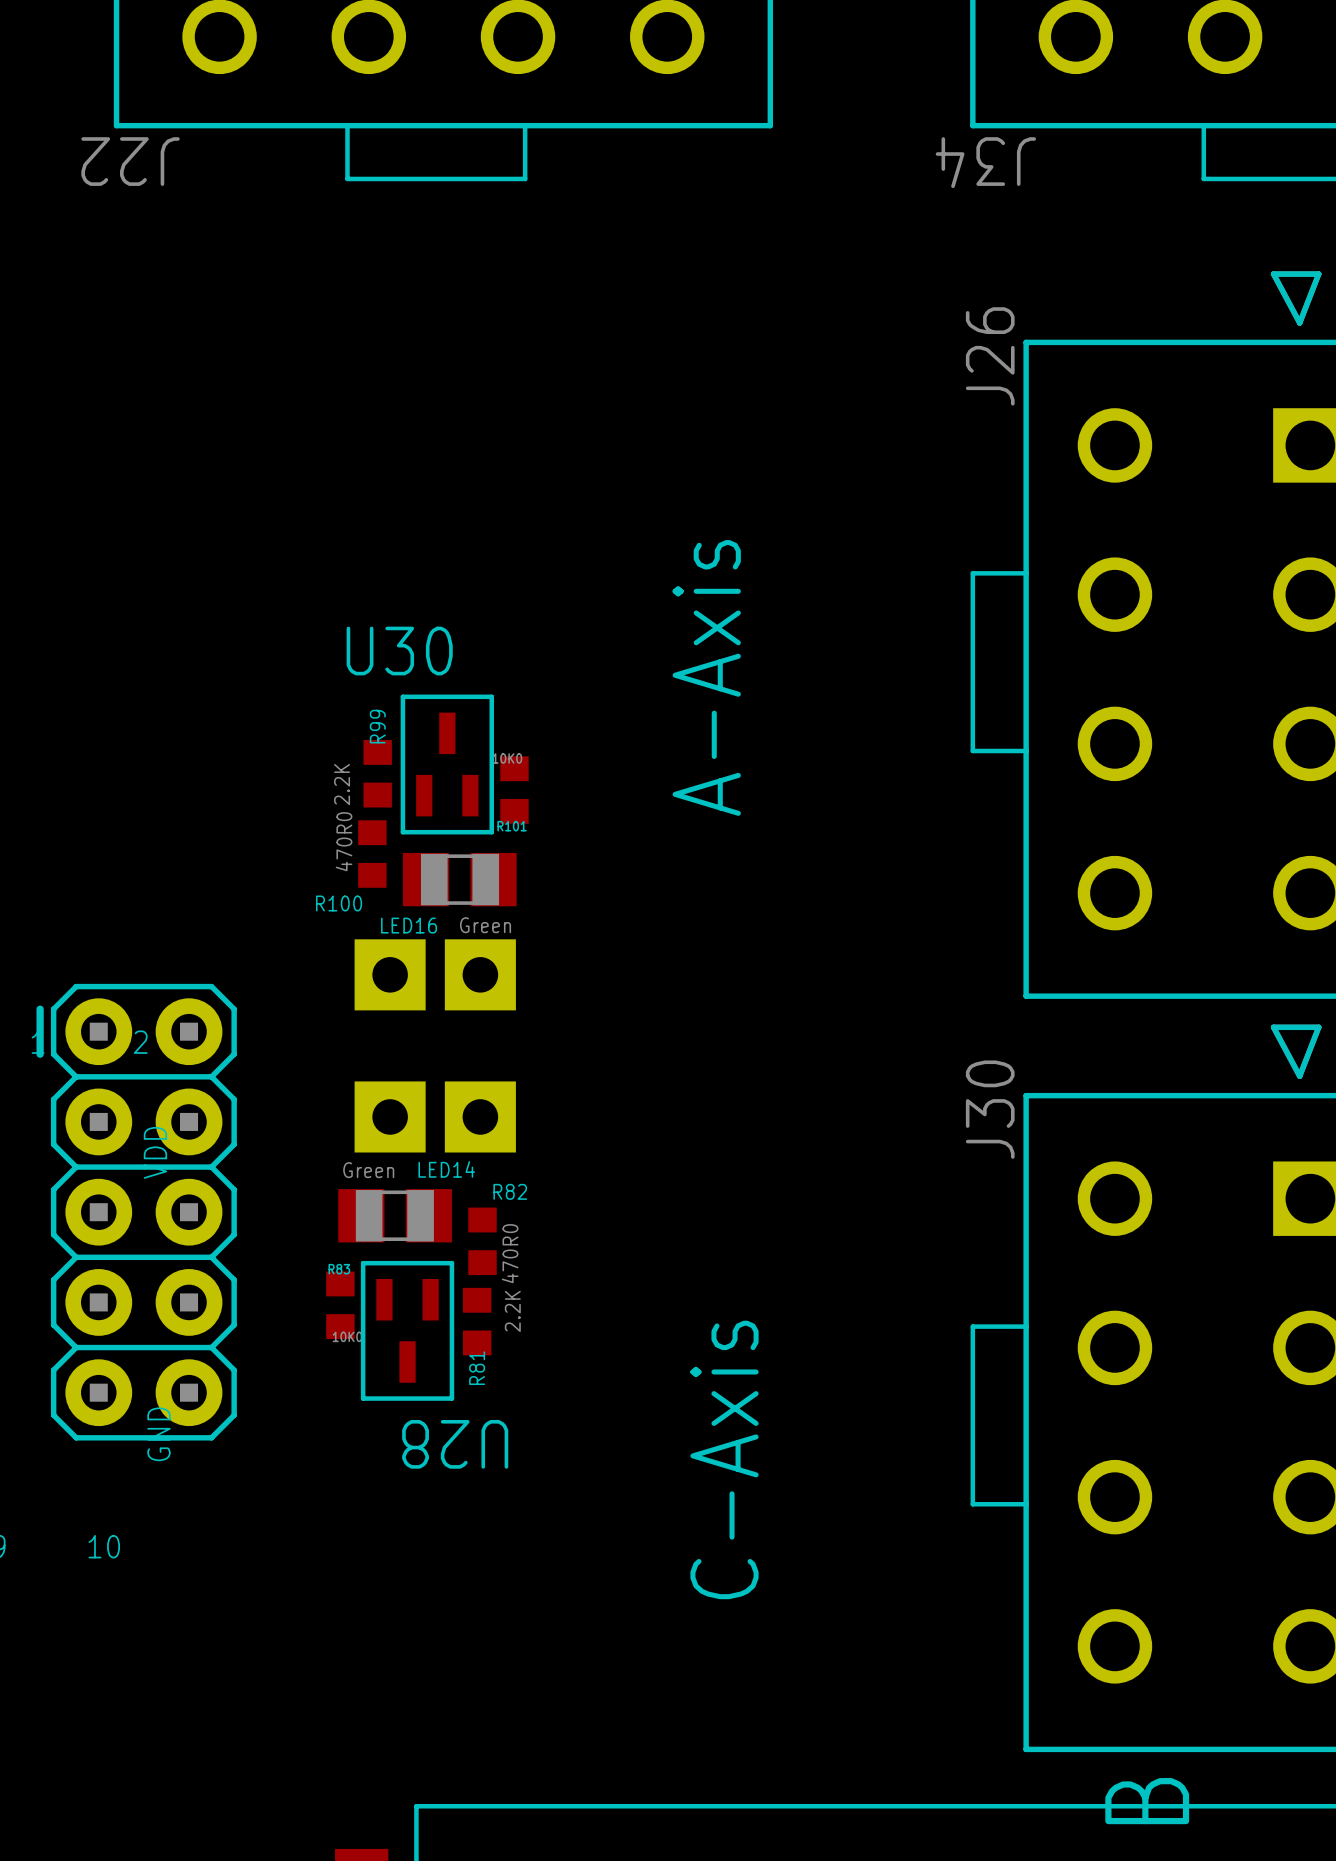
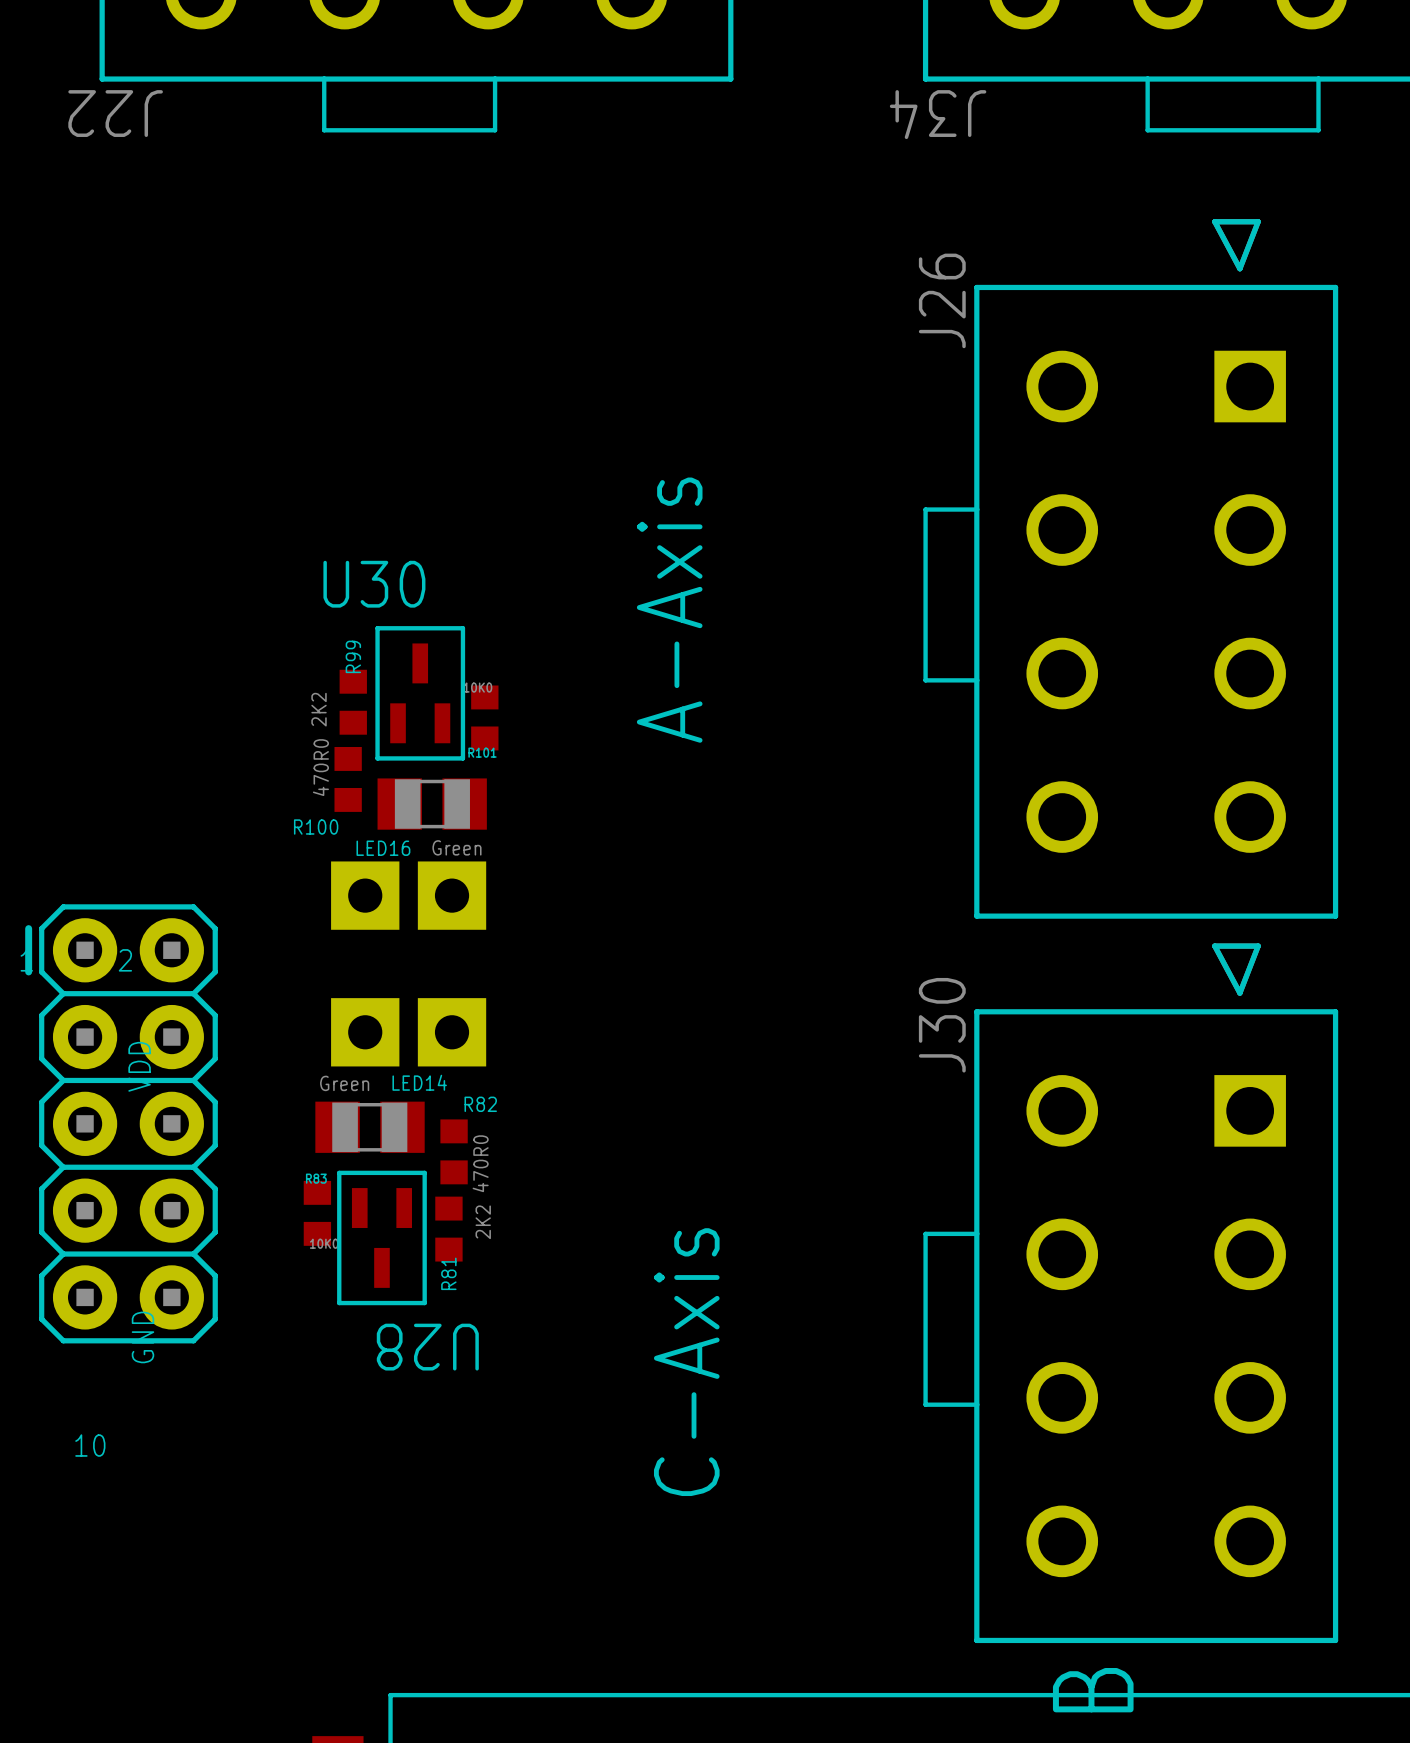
R99 value: 2.2K (342, 784) -> 2K2 (319, 709)
R81 value: 2.2K (512, 1311) -> 2K2 (483, 1222)

